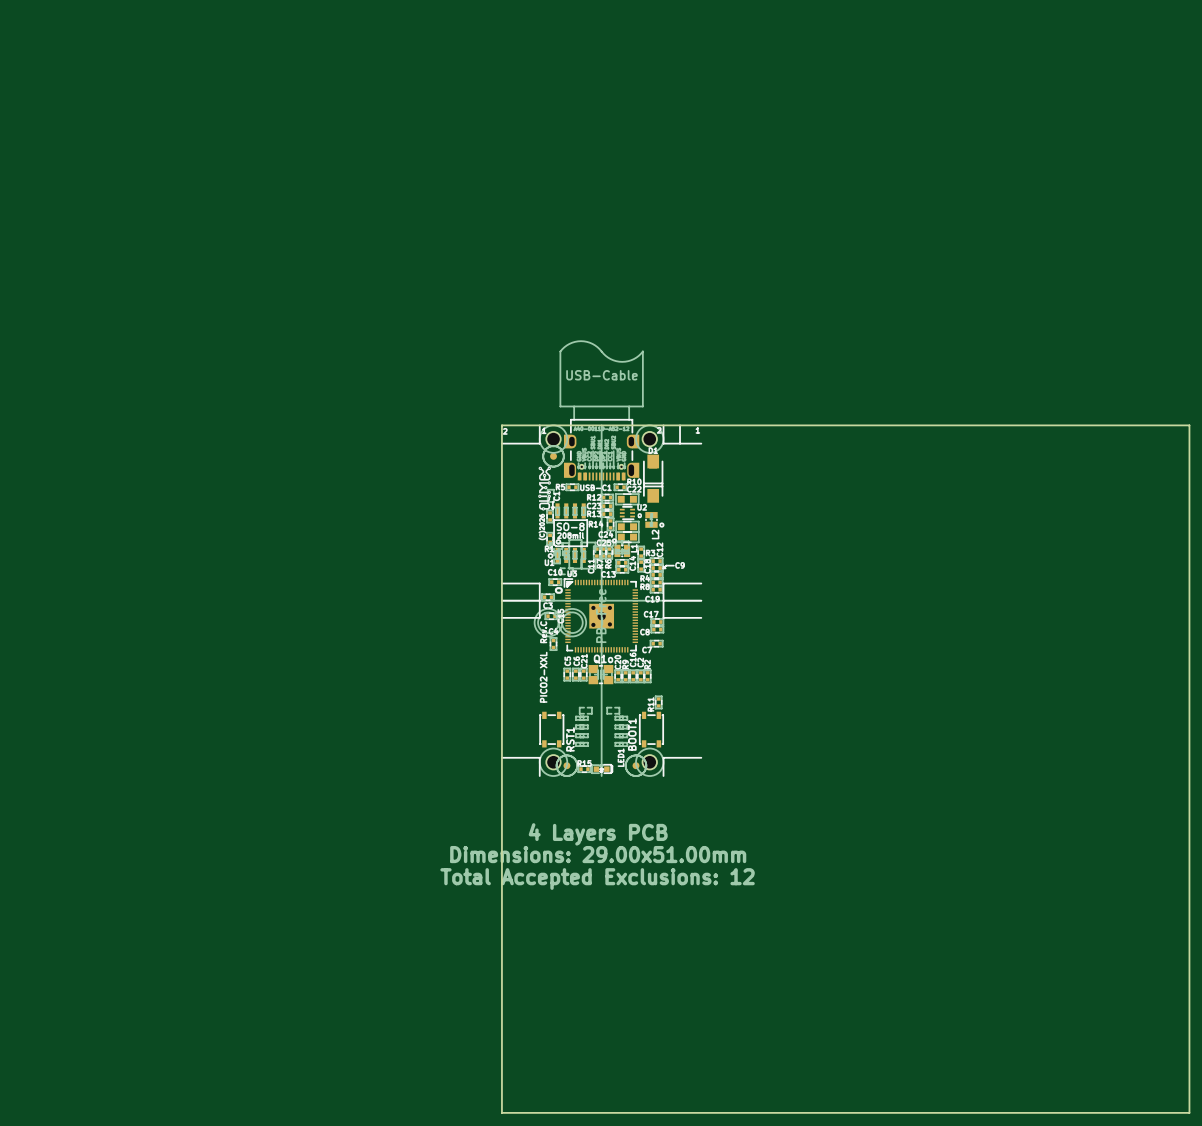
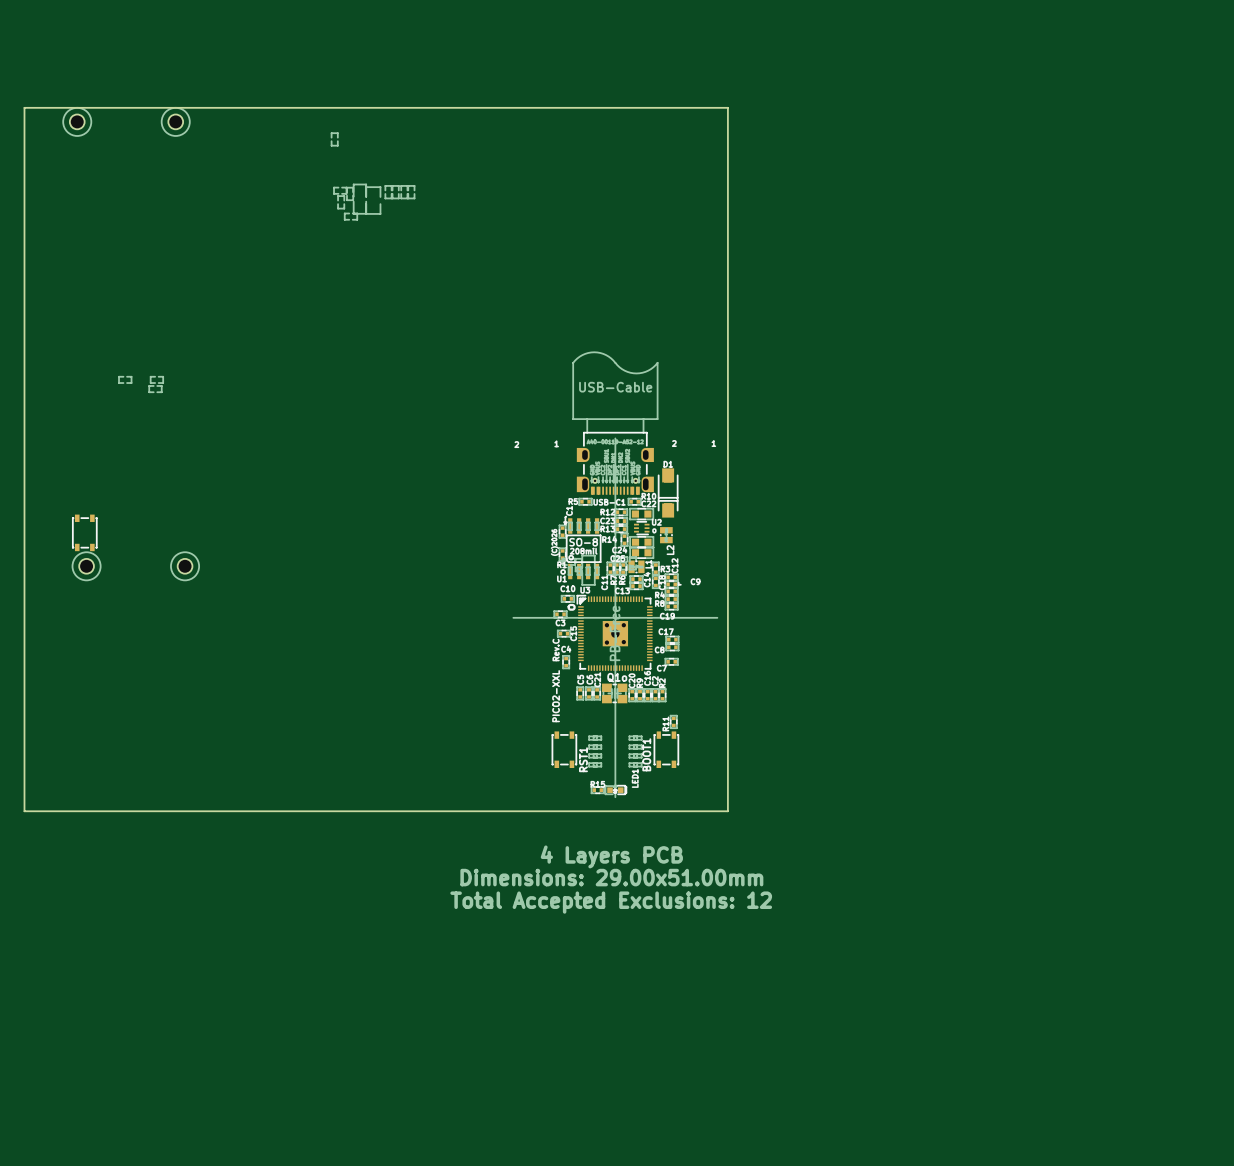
board edge: none -> (24, 107) (727, 107) (727, 811) (24, 811) (24, 107)
part: none -> (77, 121)
part: none -> (175, 121)
part: none -> (334, 139)
part: none -> (340, 190)
part: none -> (388, 192)
part: none -> (395, 192)
part: none -> (404, 192)
part: none -> (411, 192)
part: none -> (350, 193)
part: none -> (359, 199)
part: none -> (373, 200)
part: none -> (341, 202)
part: none -> (350, 216)
part: none -> (125, 379)
part: none -> (156, 379)
part: none -> (155, 389)
board edge: (501, 425) (1189, 425) (1189, 1112) (501, 1112) (501, 425) -> none
line: (539, 425) (539, 443) (501, 443) -> none
line: (663, 425) (663, 443) (701, 443) -> none
line: (680, 425) (680, 443) -> none
part: (553, 439) -> none
part: (649, 439) -> none
part: (553, 456) -> none
part: (553, 456) -> none
drawing: [538, 466, 551, 511] -> none
part: (550, 495) -> none
part: none -> (84, 532)
drawing: [659, 522, 665, 528] -> none
drawing: [611, 538, 617, 544] -> none
part: (625, 547) -> none
part: none -> (86, 566)
part: none -> (185, 566)
part: (588, 555) -> none
part: (557, 557) -> none
line: (673, 565) (666, 565) (663, 568) -> none
part: (566, 571) -> none
line: (501, 583) (539, 583) (539, 617) (501, 617) -> none
line: (701, 583) (663, 583) (663, 617) (701, 617) -> none
line: (501, 600) (539, 600) -> none
line: (663, 600) (701, 600) -> none
drawing: [533, 608, 588, 638] -> none
part: (585, 710) -> none
part: (613, 710) -> none
line: (501, 757) (539, 757) (539, 776) -> none
line: (701, 757) (663, 757) (663, 776) -> none
part: (553, 762) -> none
part: (649, 762) -> none
part: (566, 765) -> none
part: (566, 765) -> none
part: (636, 765) -> none
part: (636, 765) -> none

